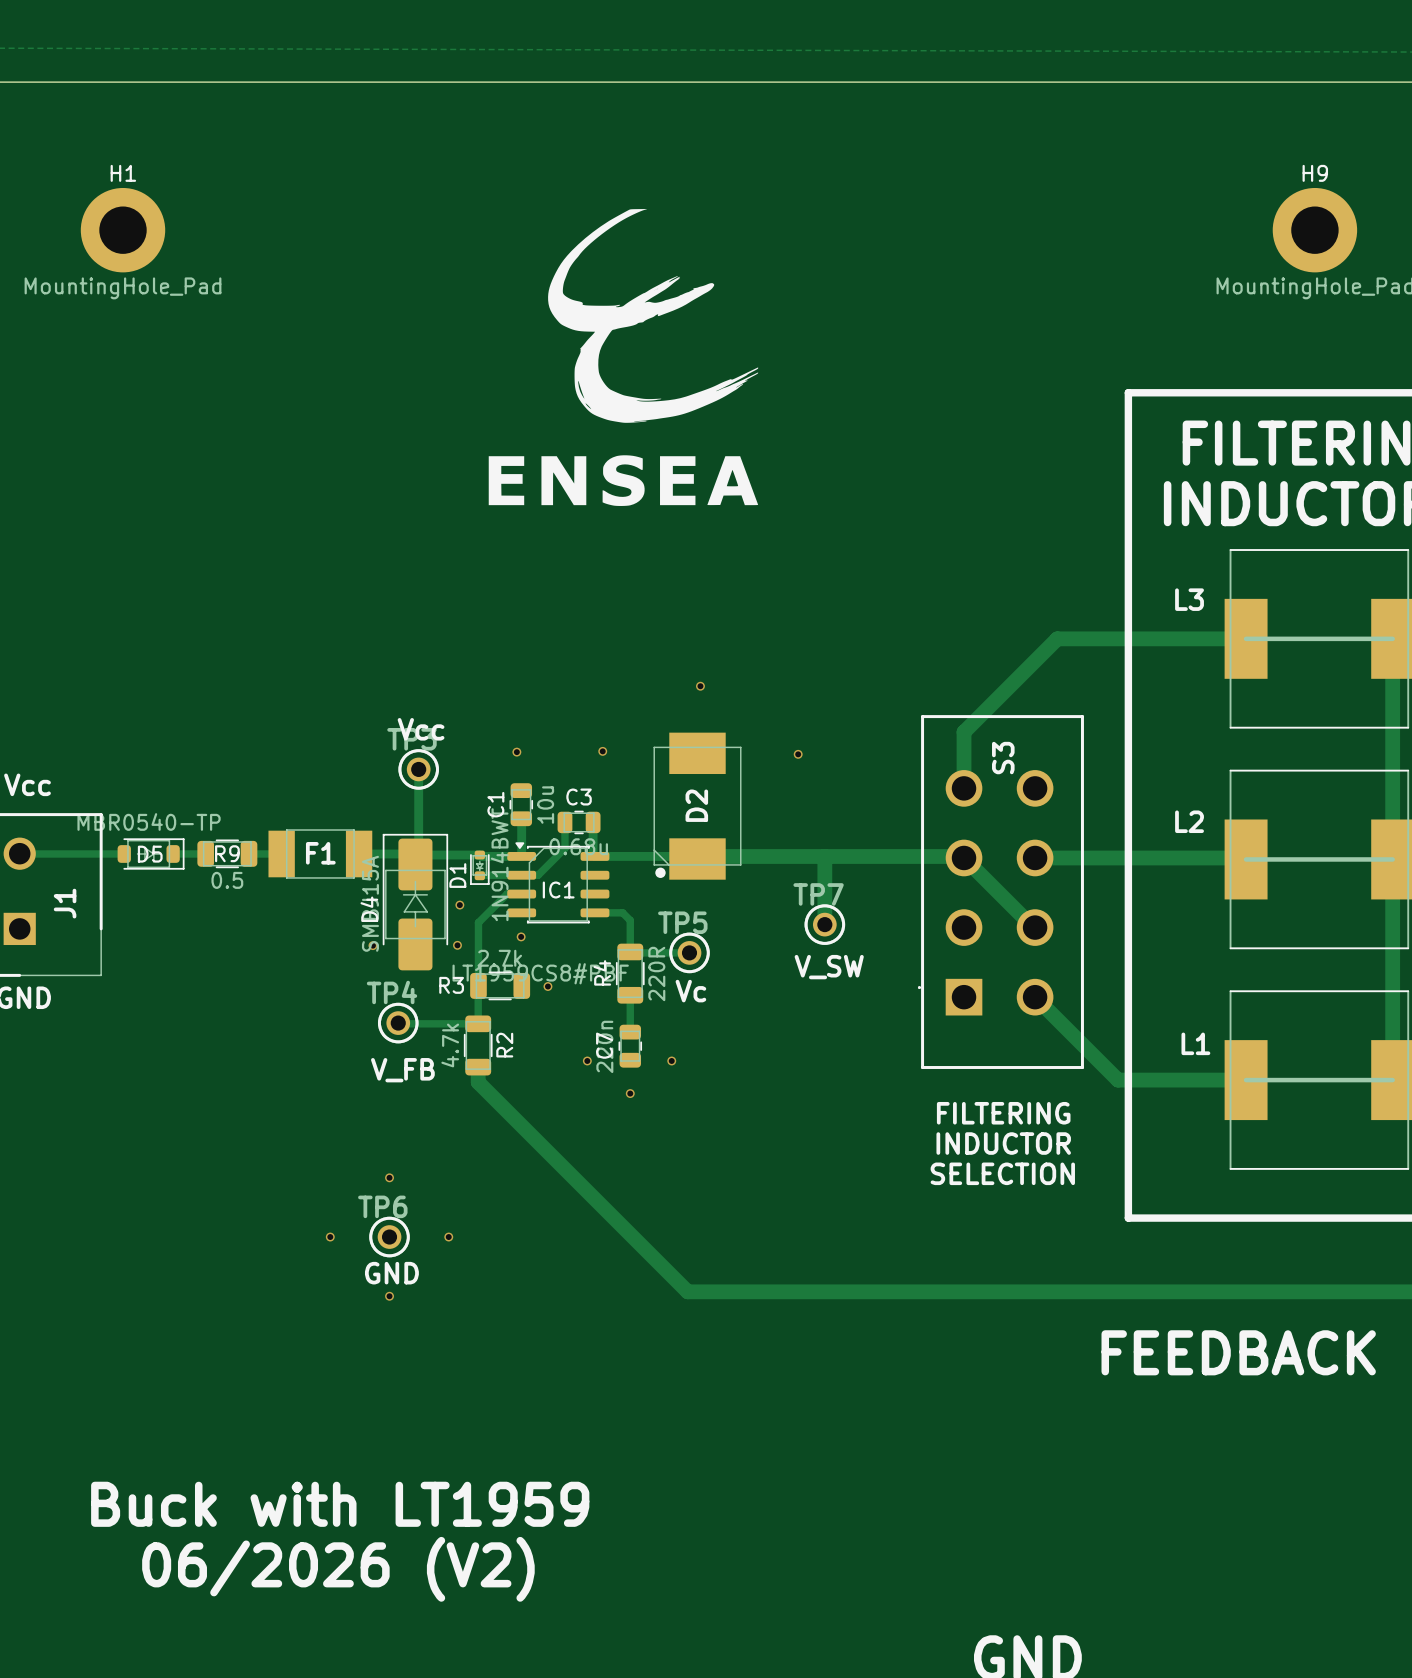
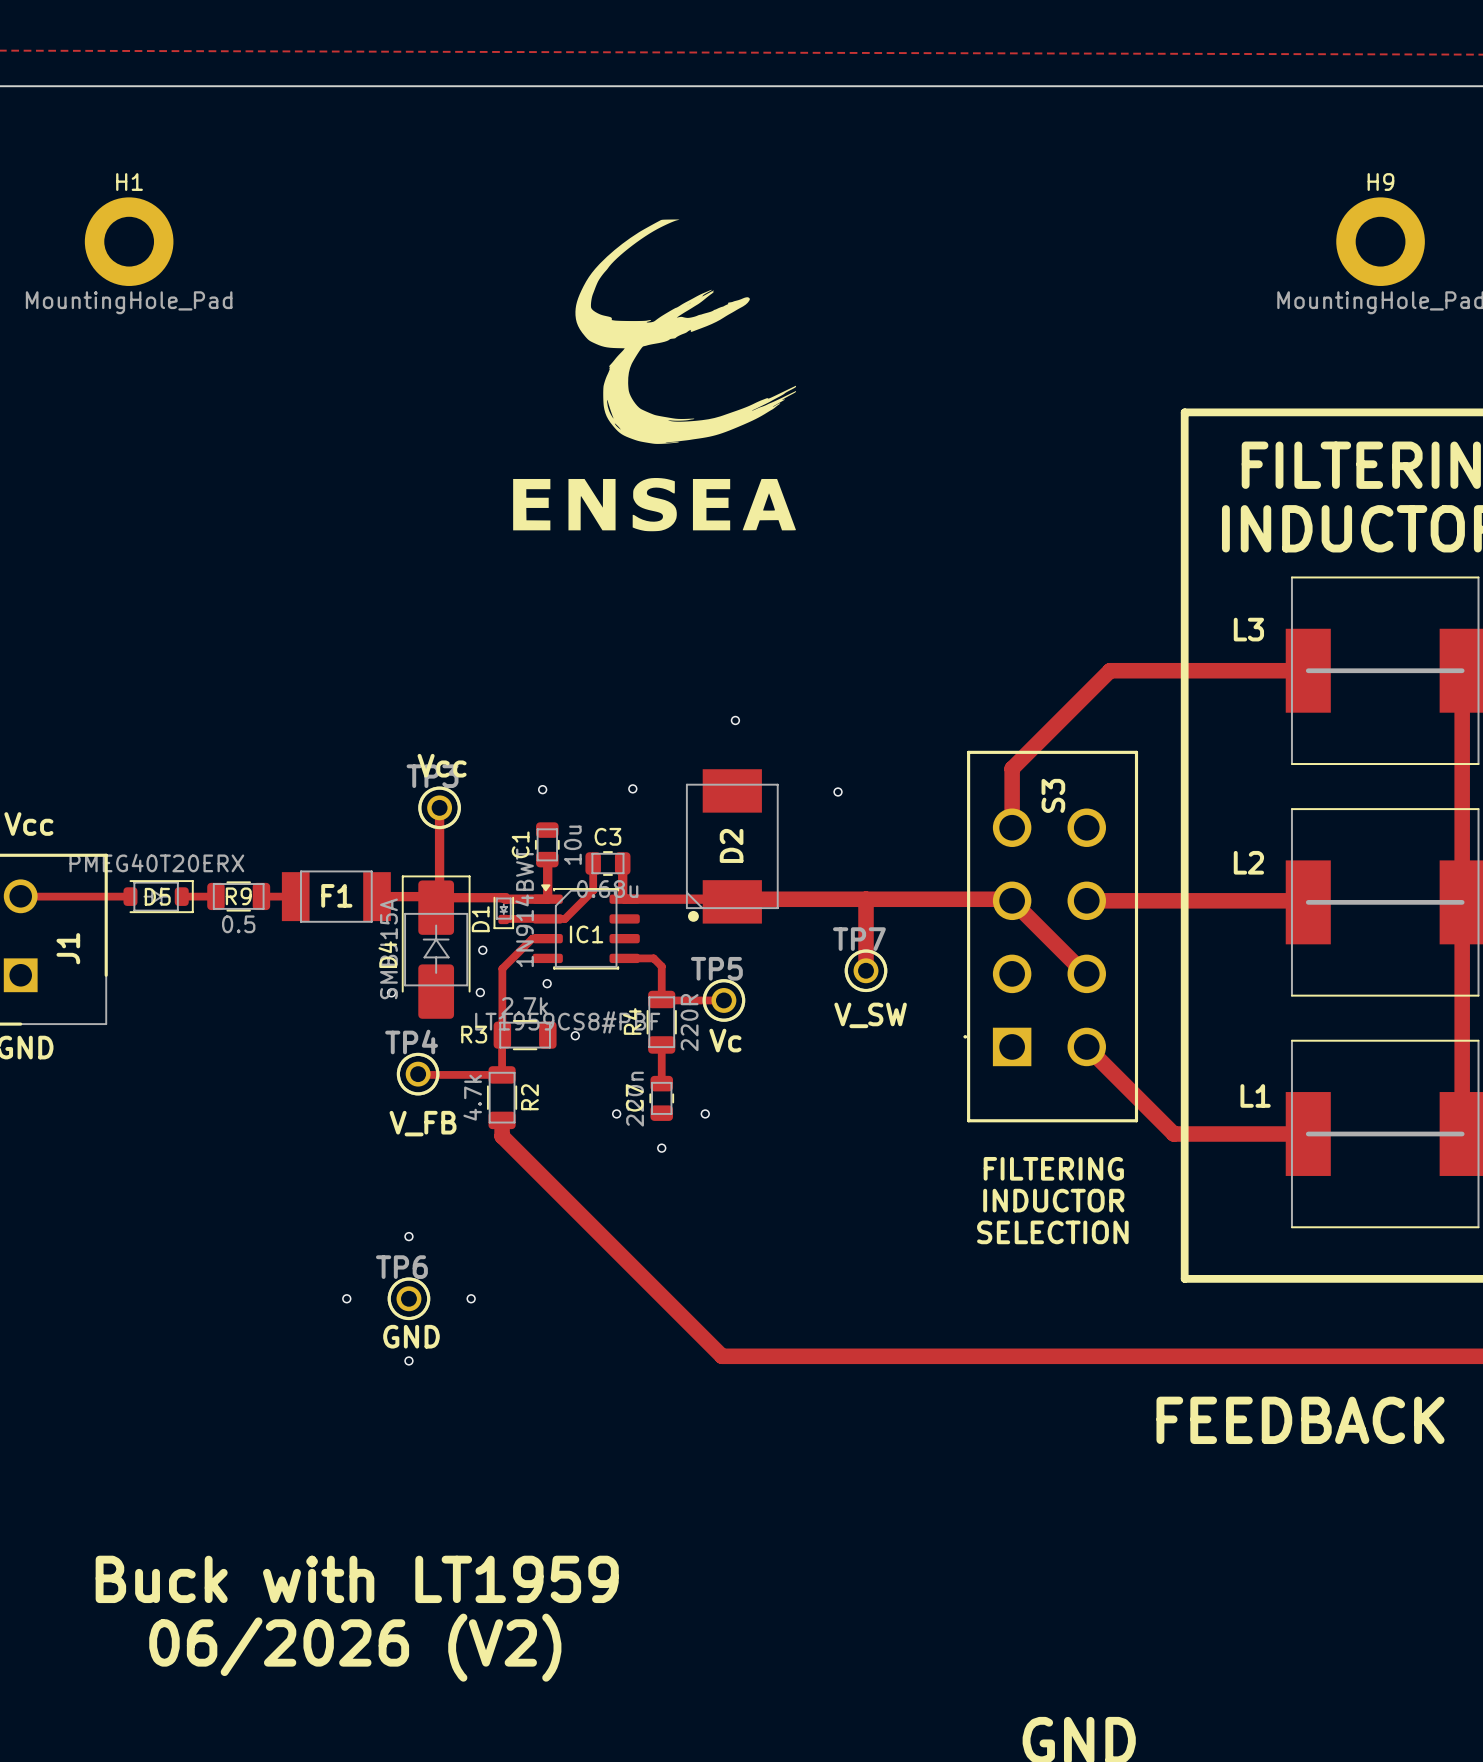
D5 value: MBR0540-TP (149, 821) -> PMEG40T20ERX (156, 863)

